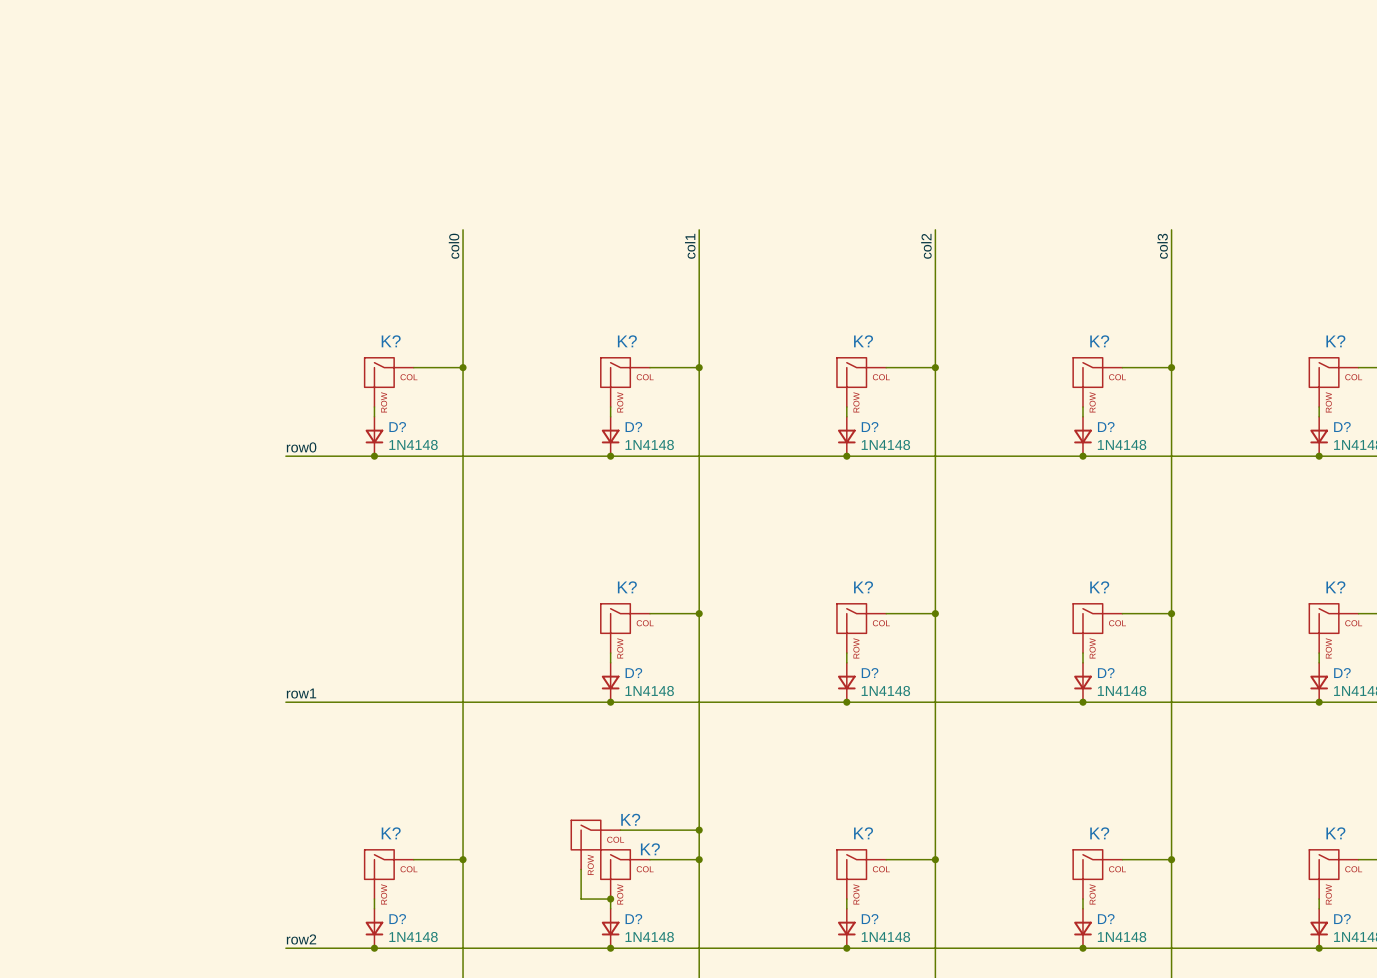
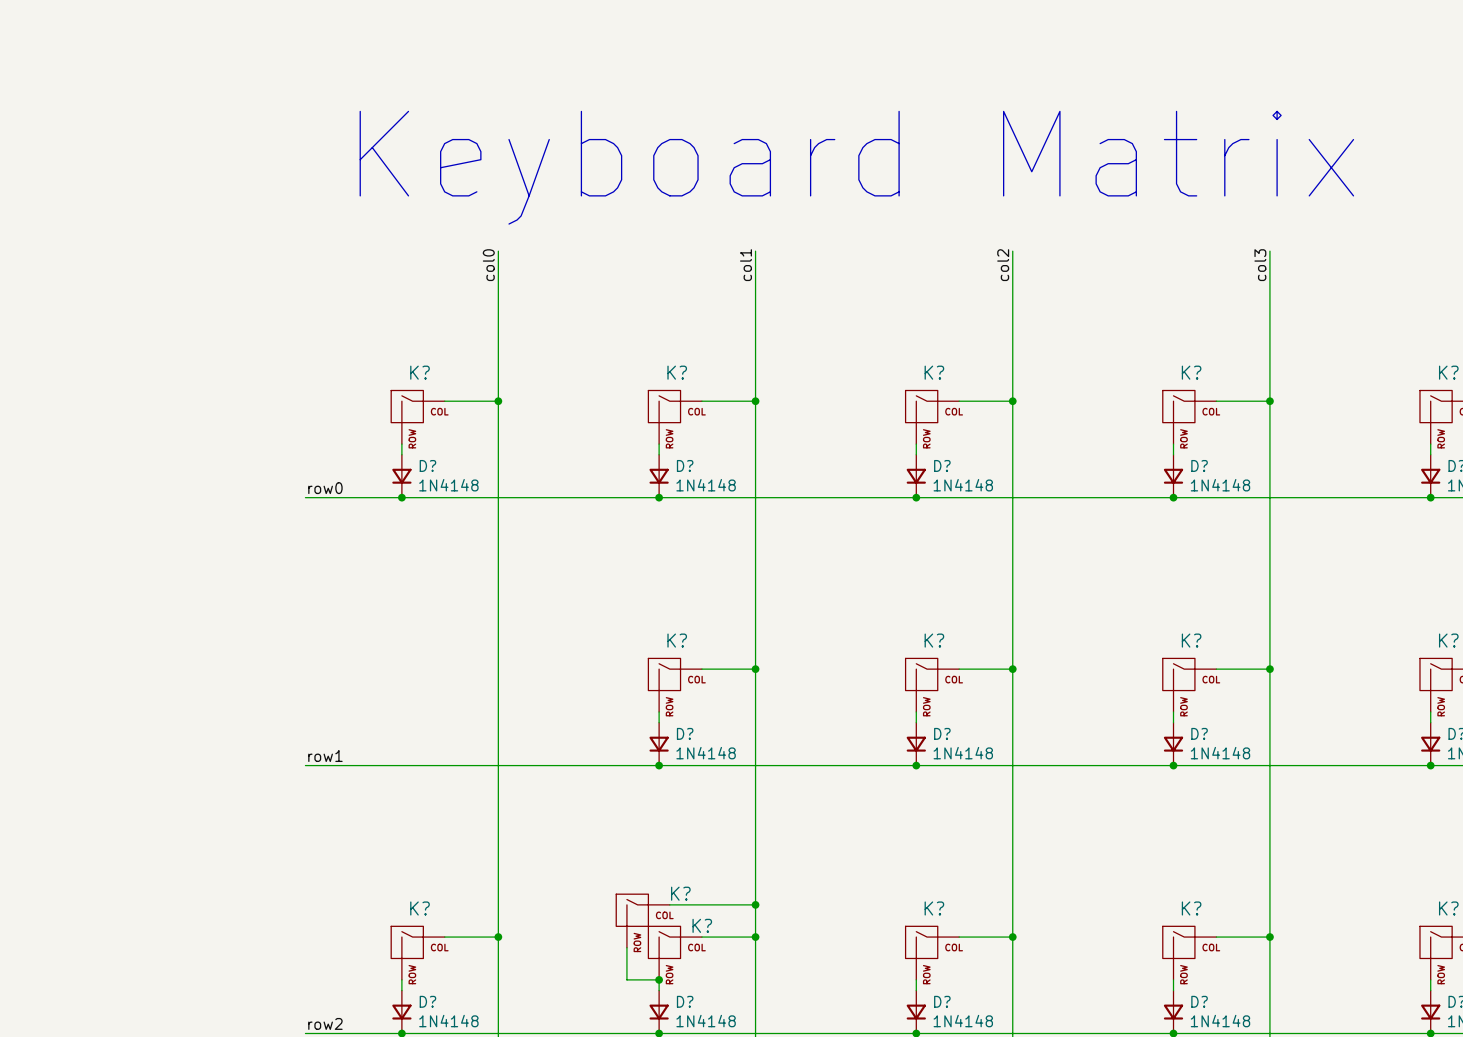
text: none -> Keyboard Matrix (856, 167)

